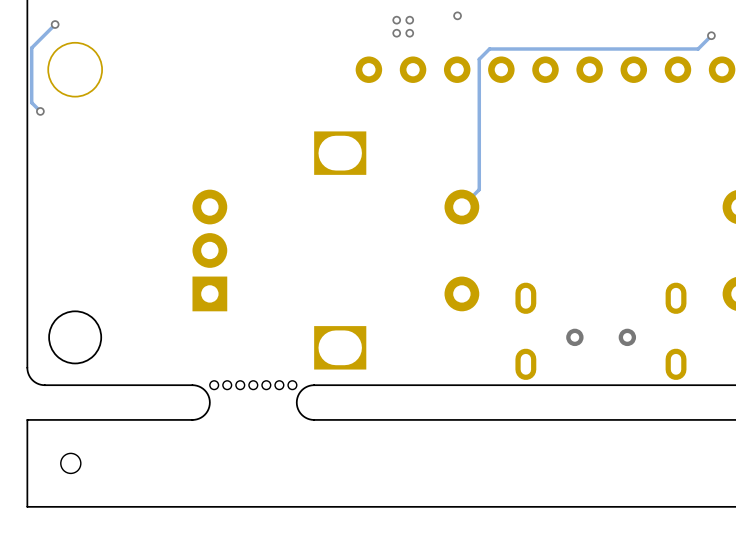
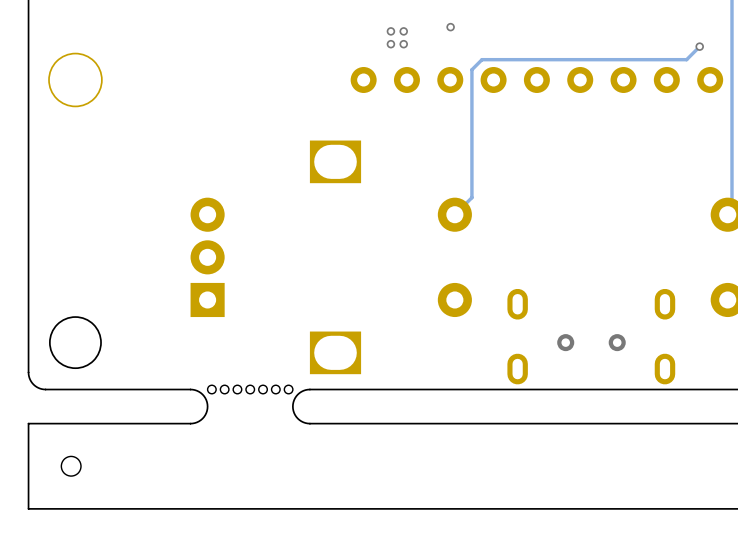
track: (55, 24) (31, 47) (31, 102) (40, 111) -> none
via: (55, 24) -> none
via: (40, 111) -> none

